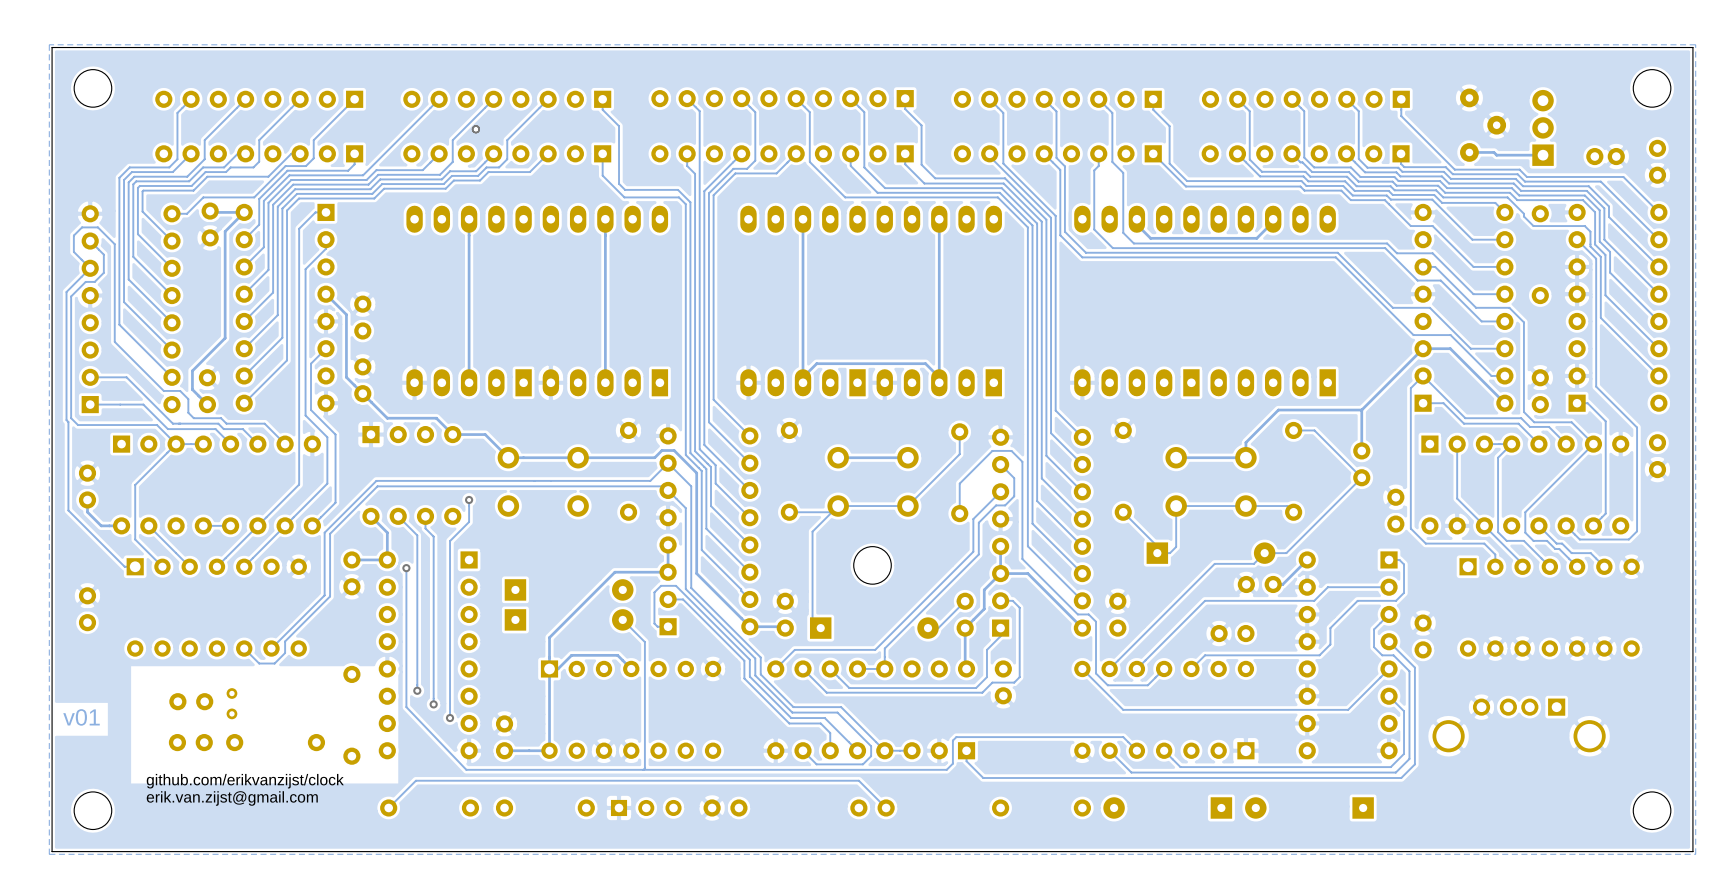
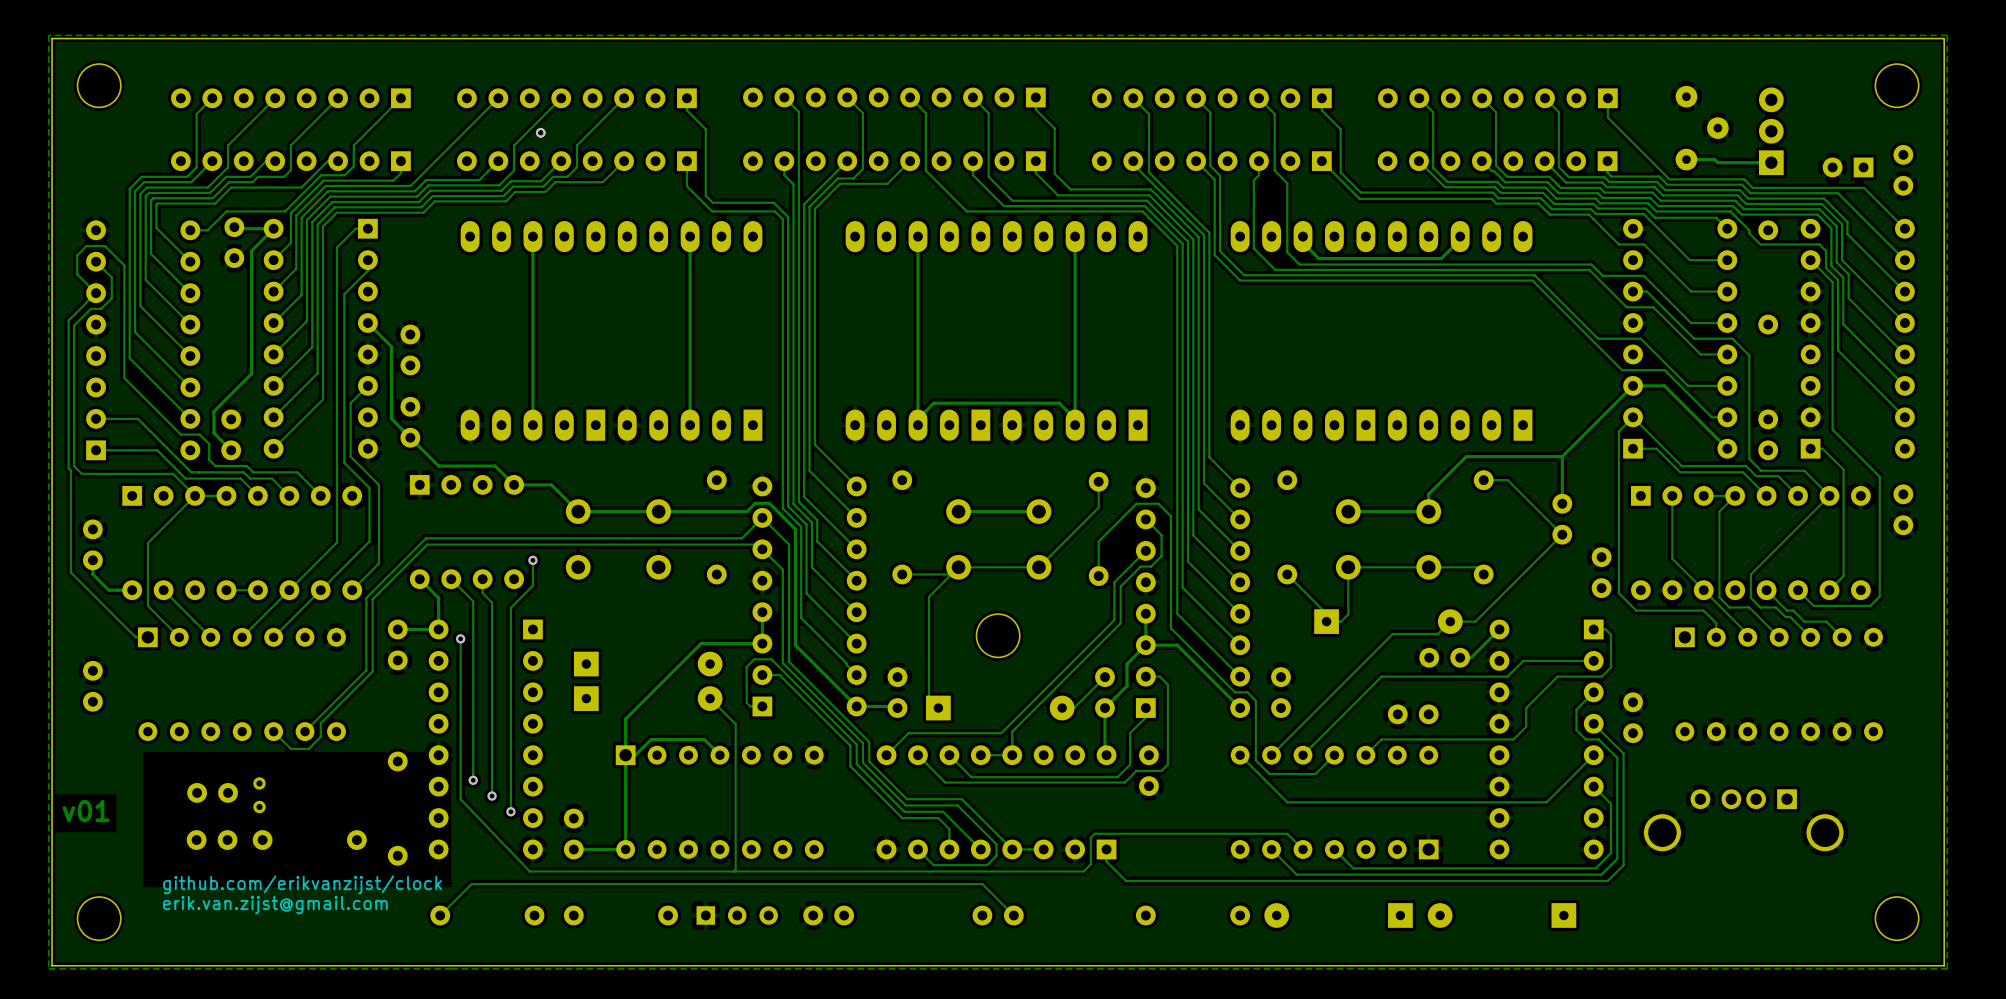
part footprint: [1586, 147, 1625, 166] -> [1822, 157, 1874, 178]

